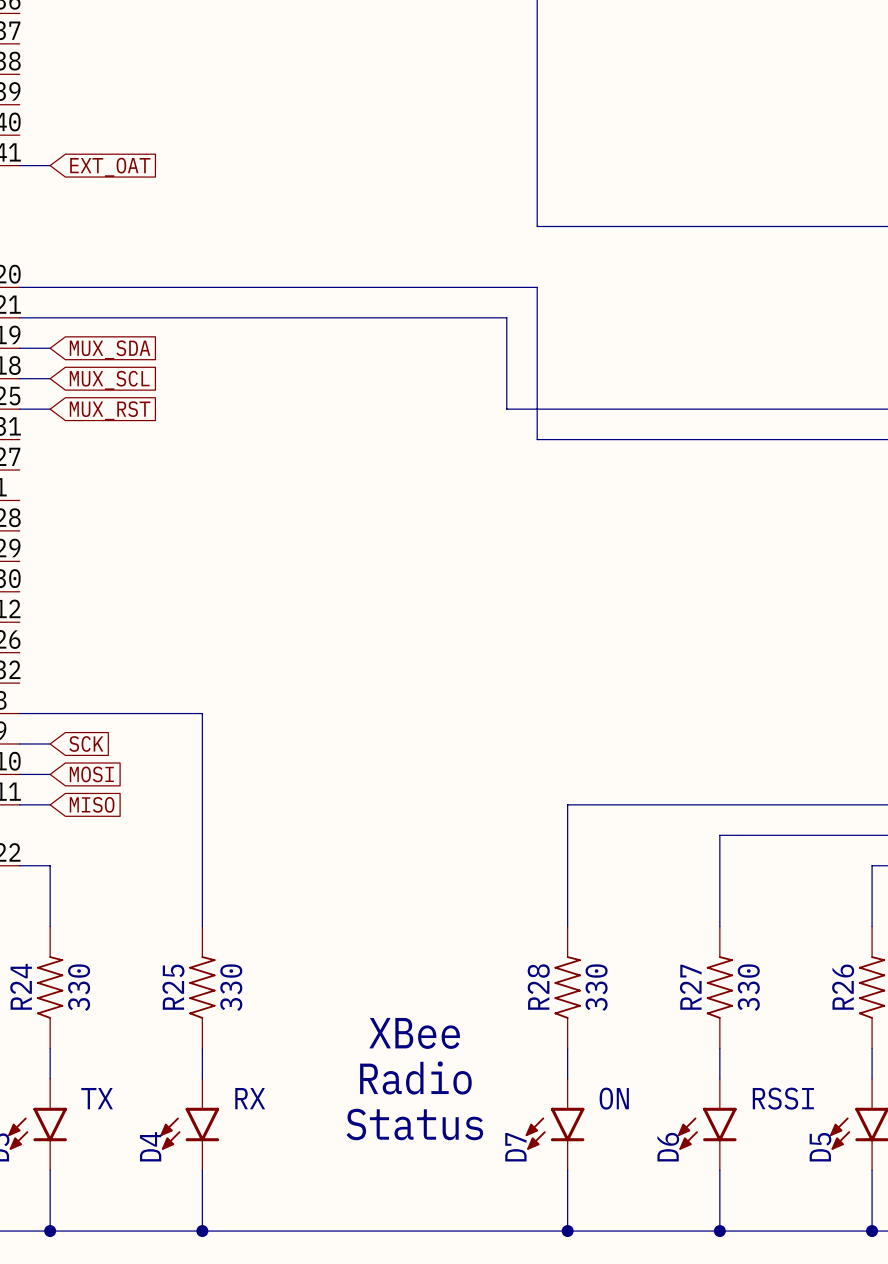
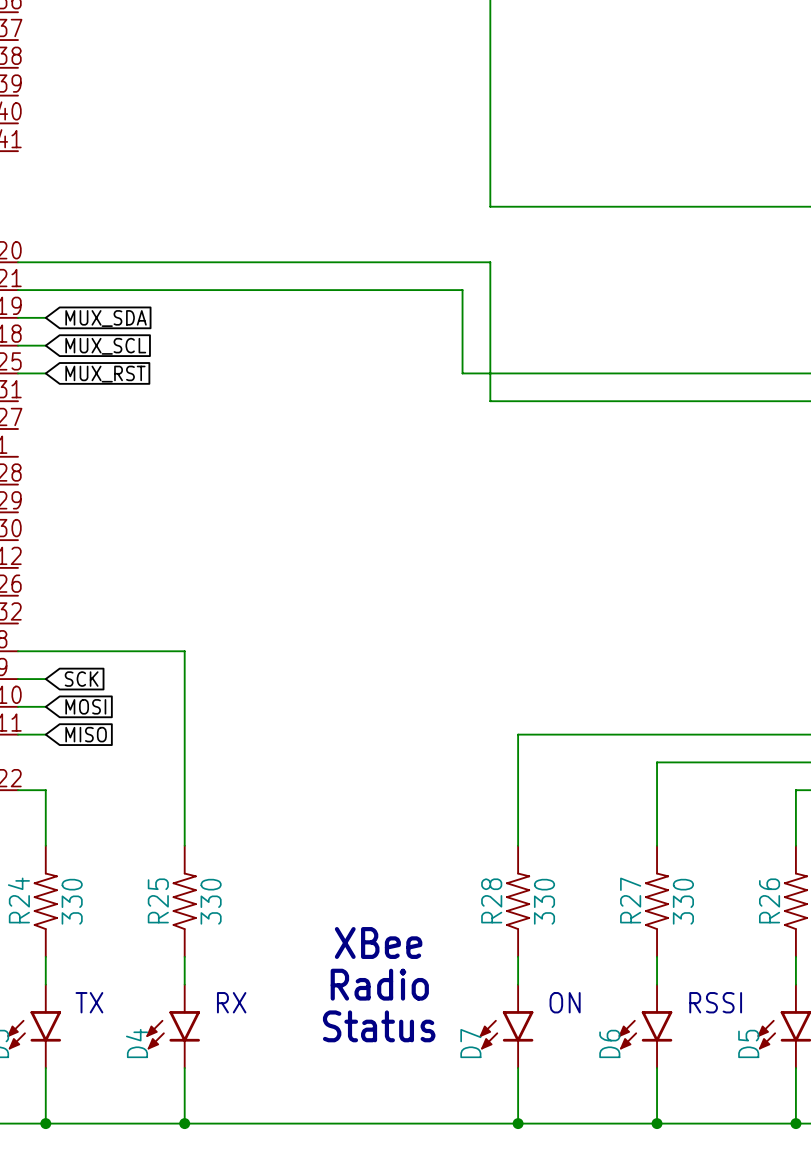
wire: (19, 165) (50, 165) -> none
global label: EXT_OAT (110, 167) -> none

